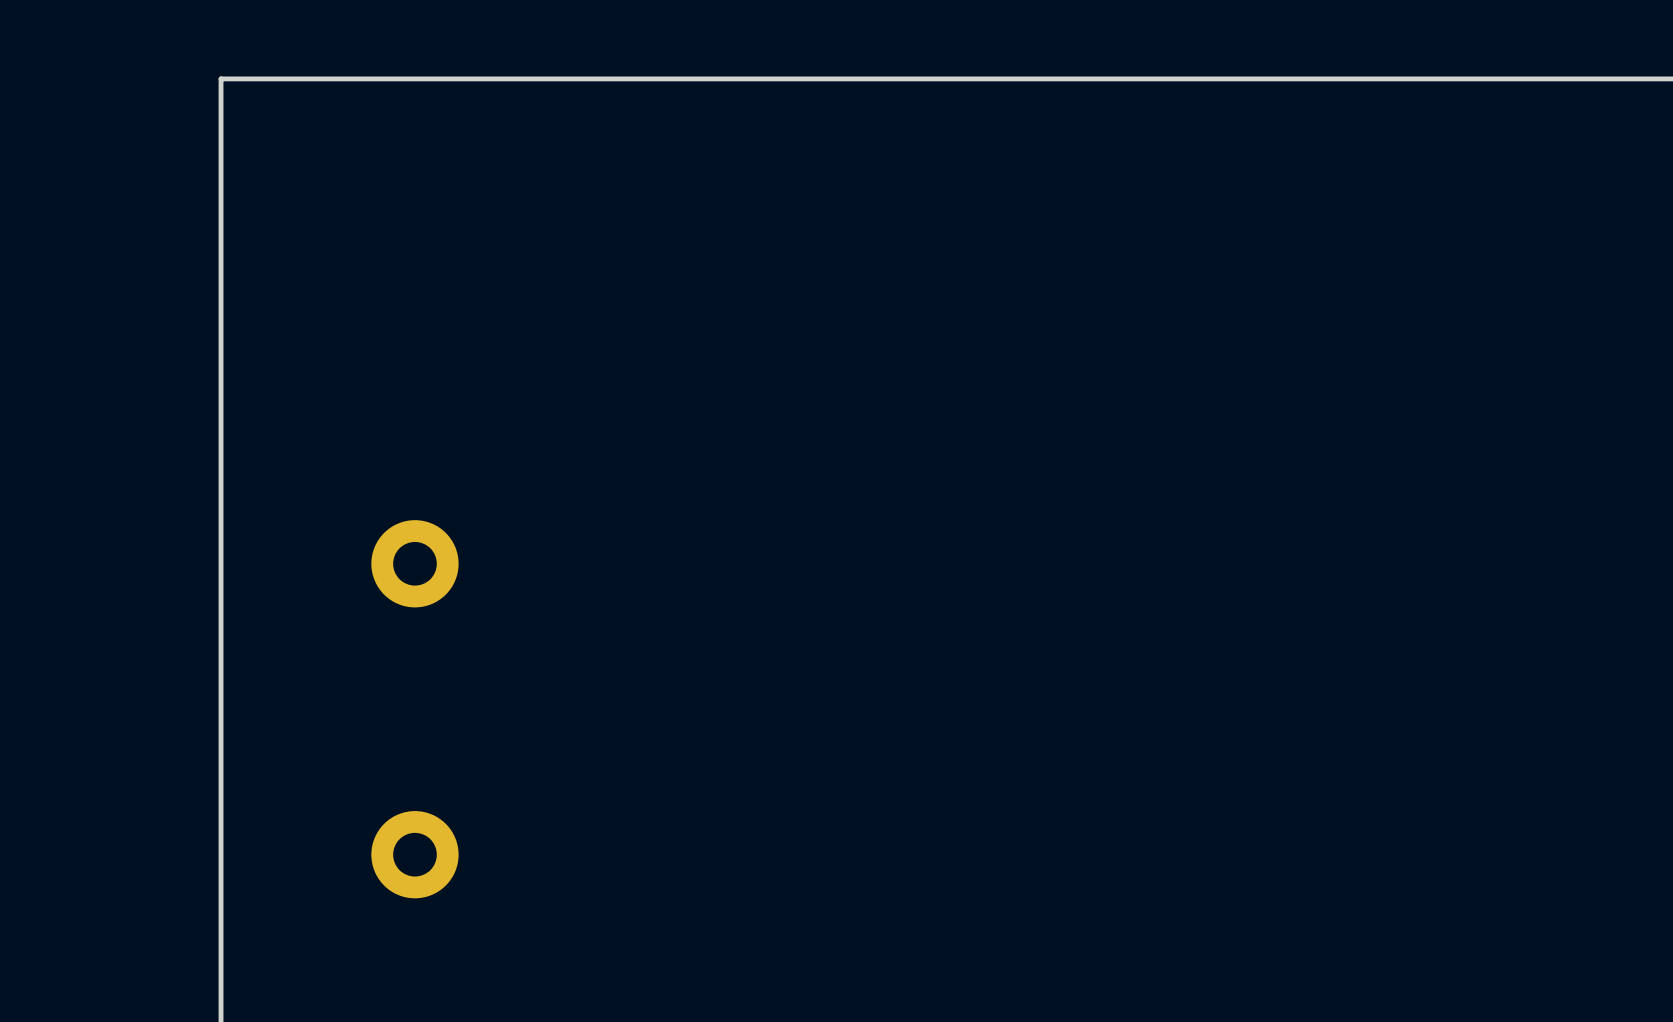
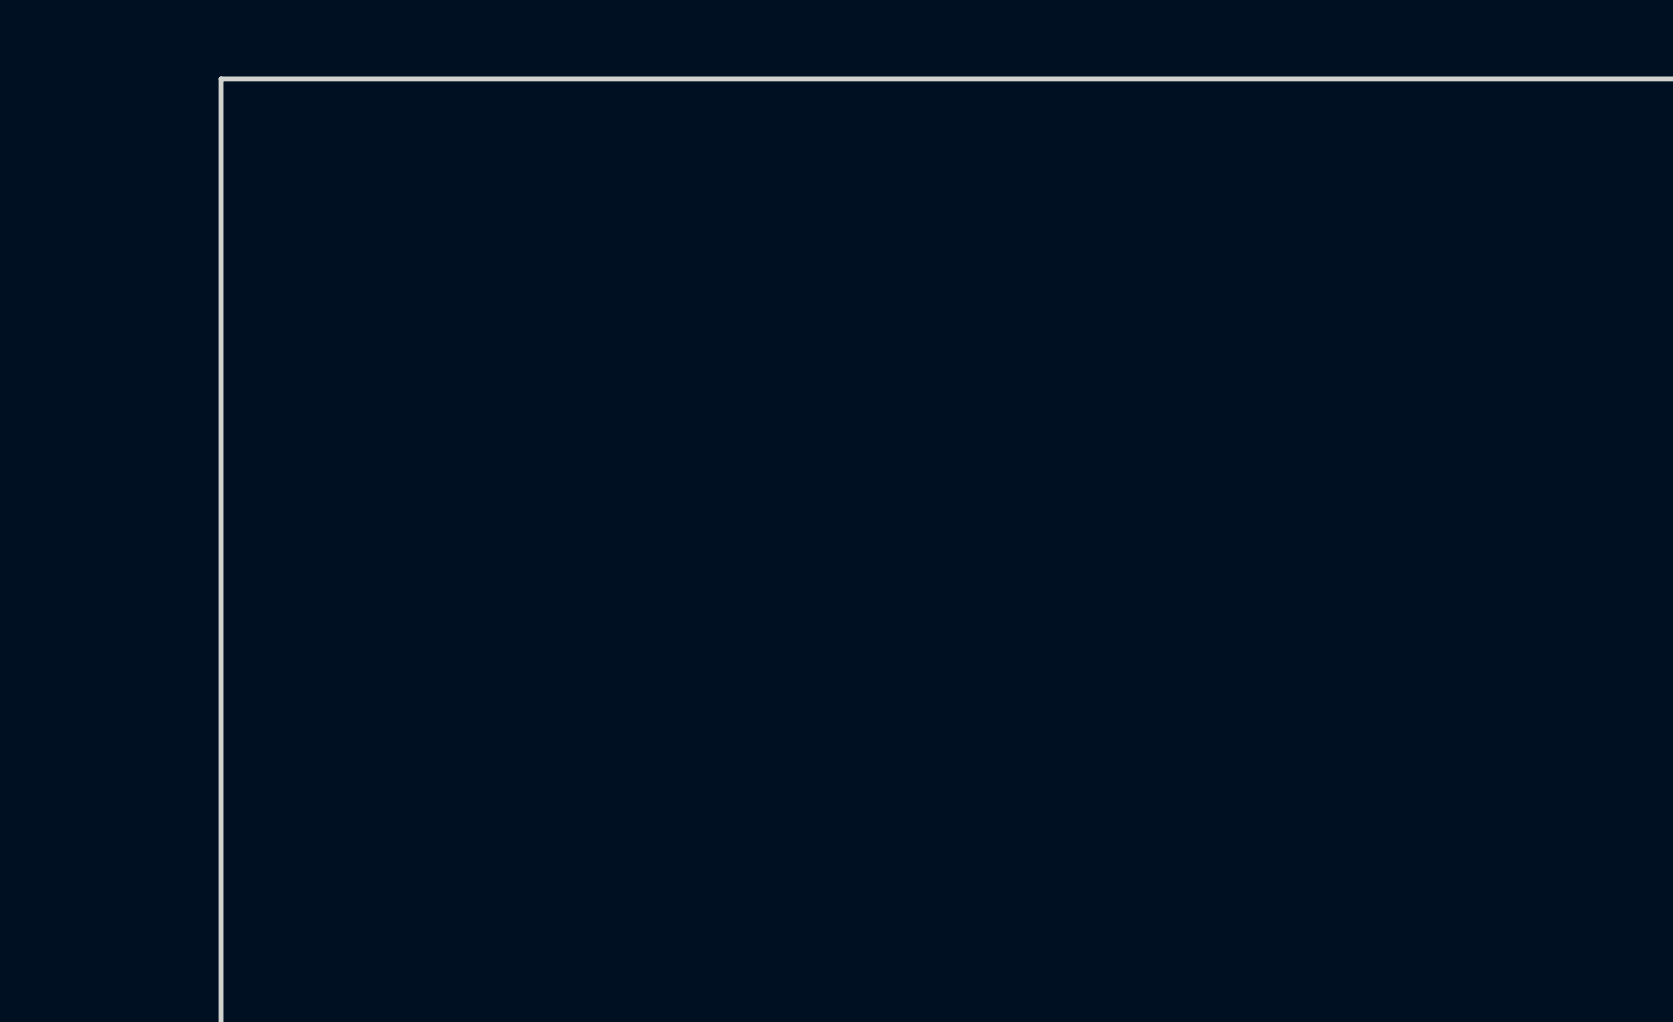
part: (414, 563) -> none
part: (414, 854) -> none

